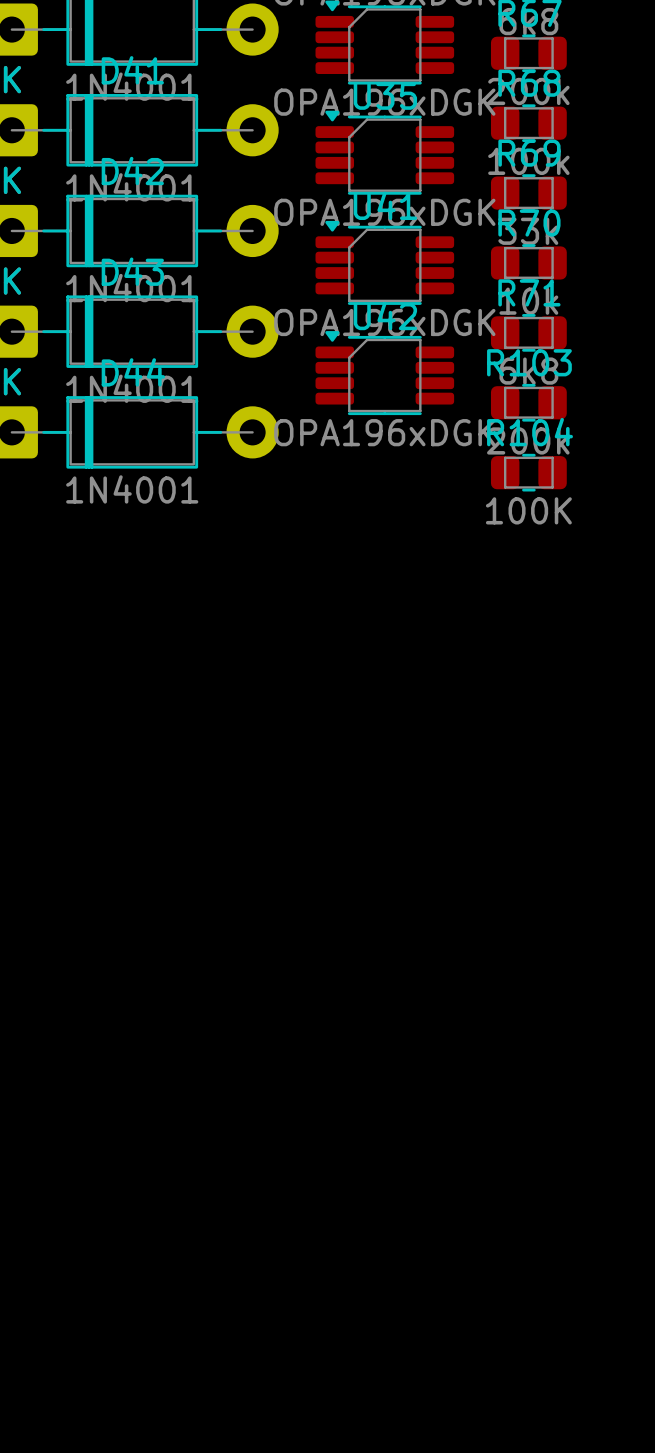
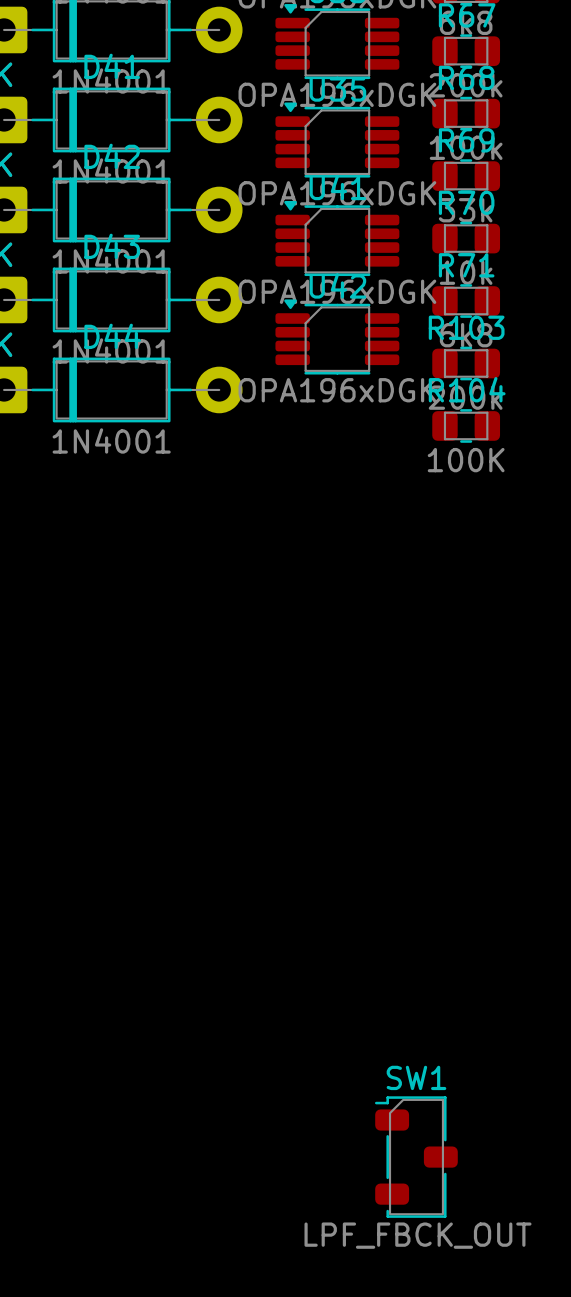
SW1: none -> LPF_FBCK_OUT (416, 1157)

